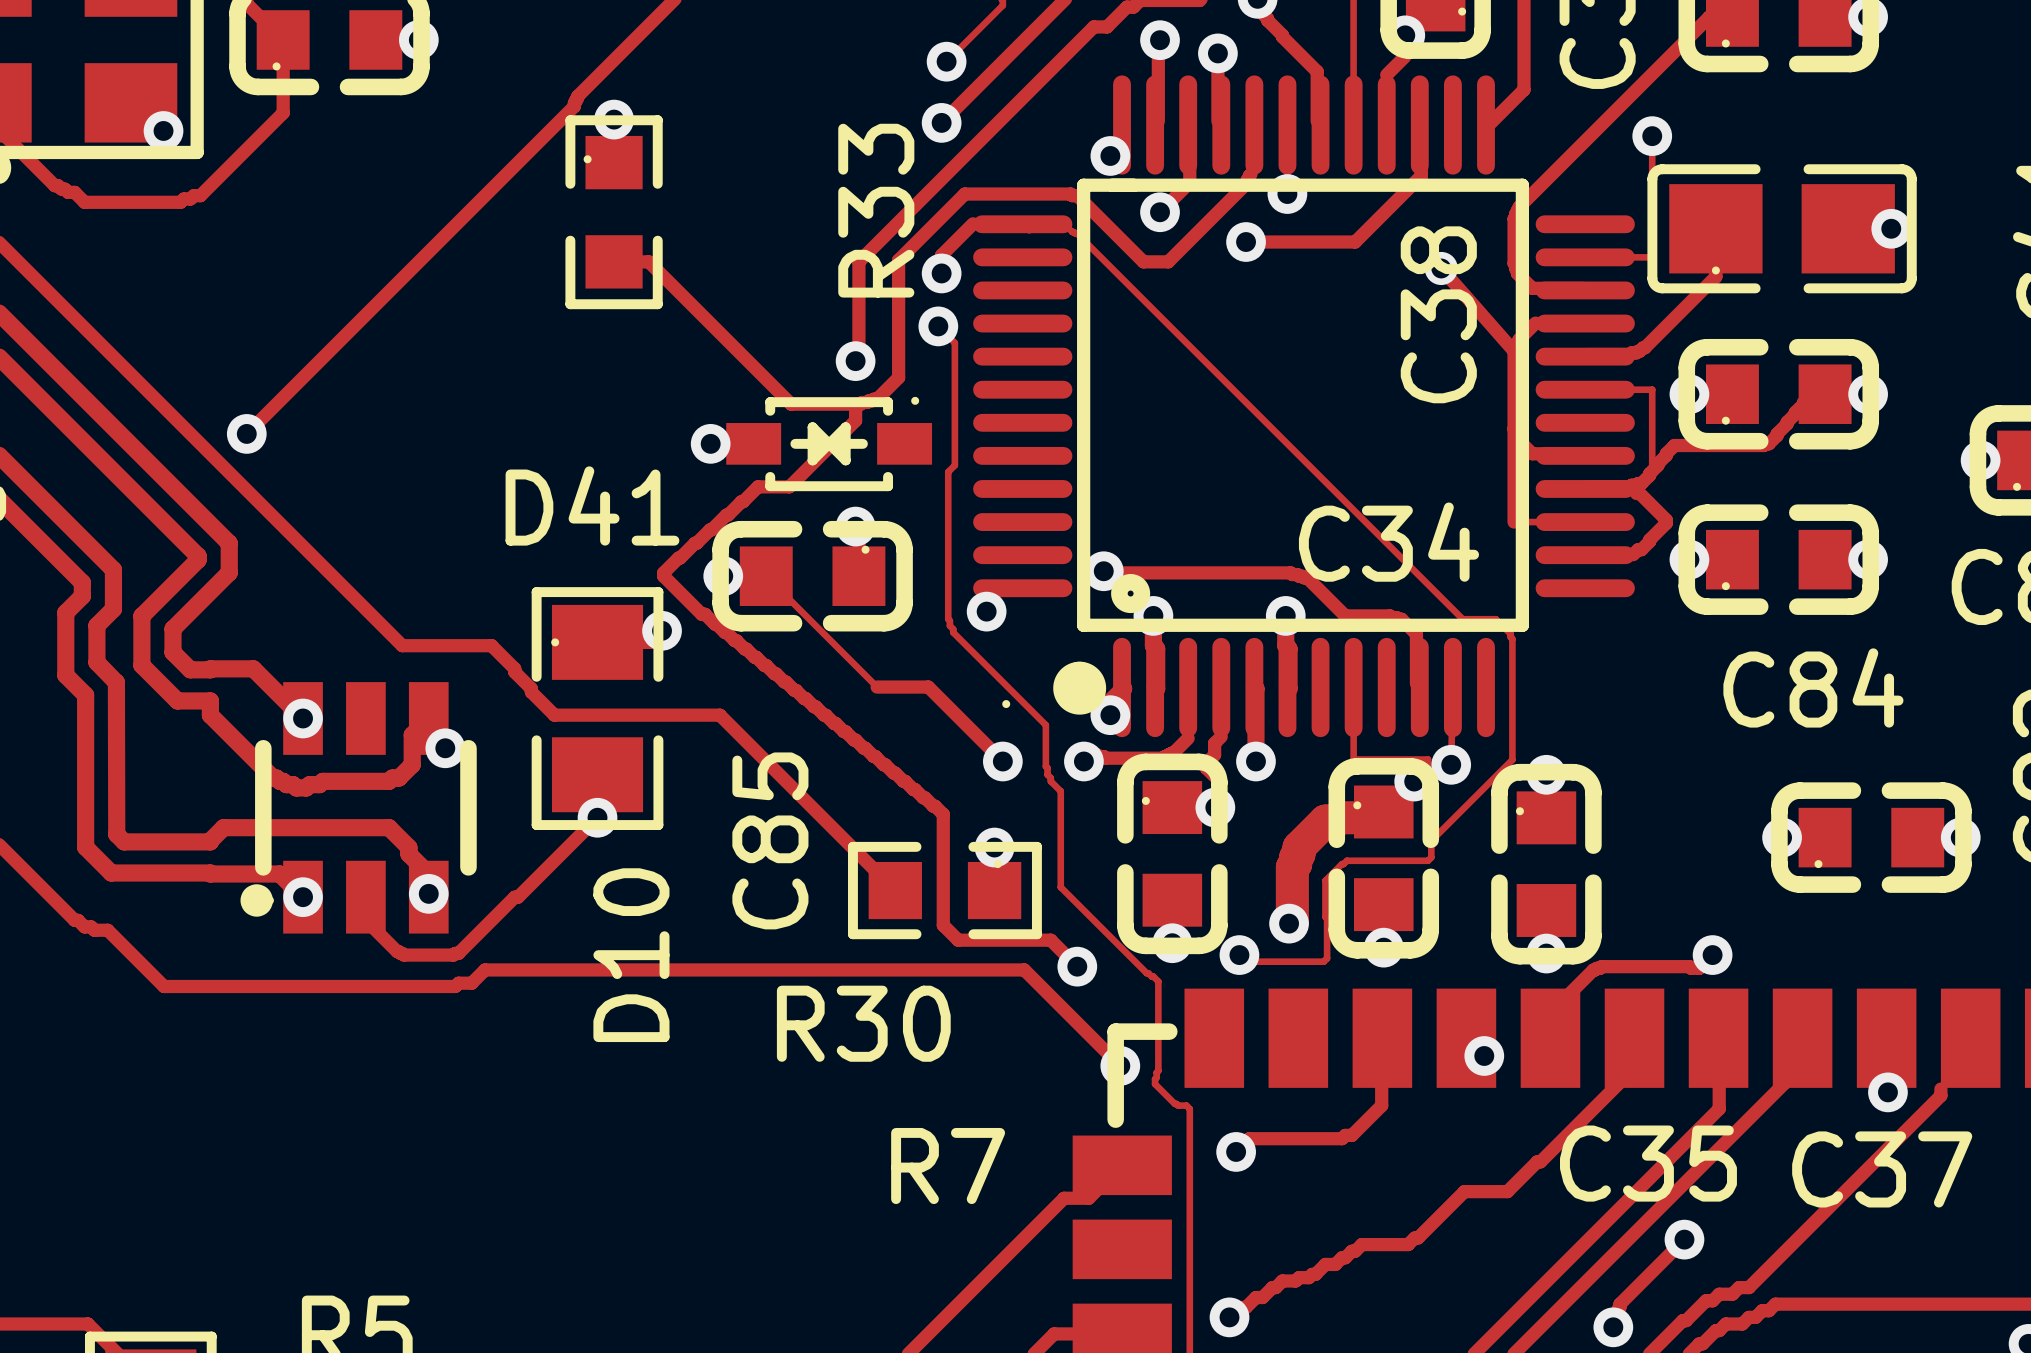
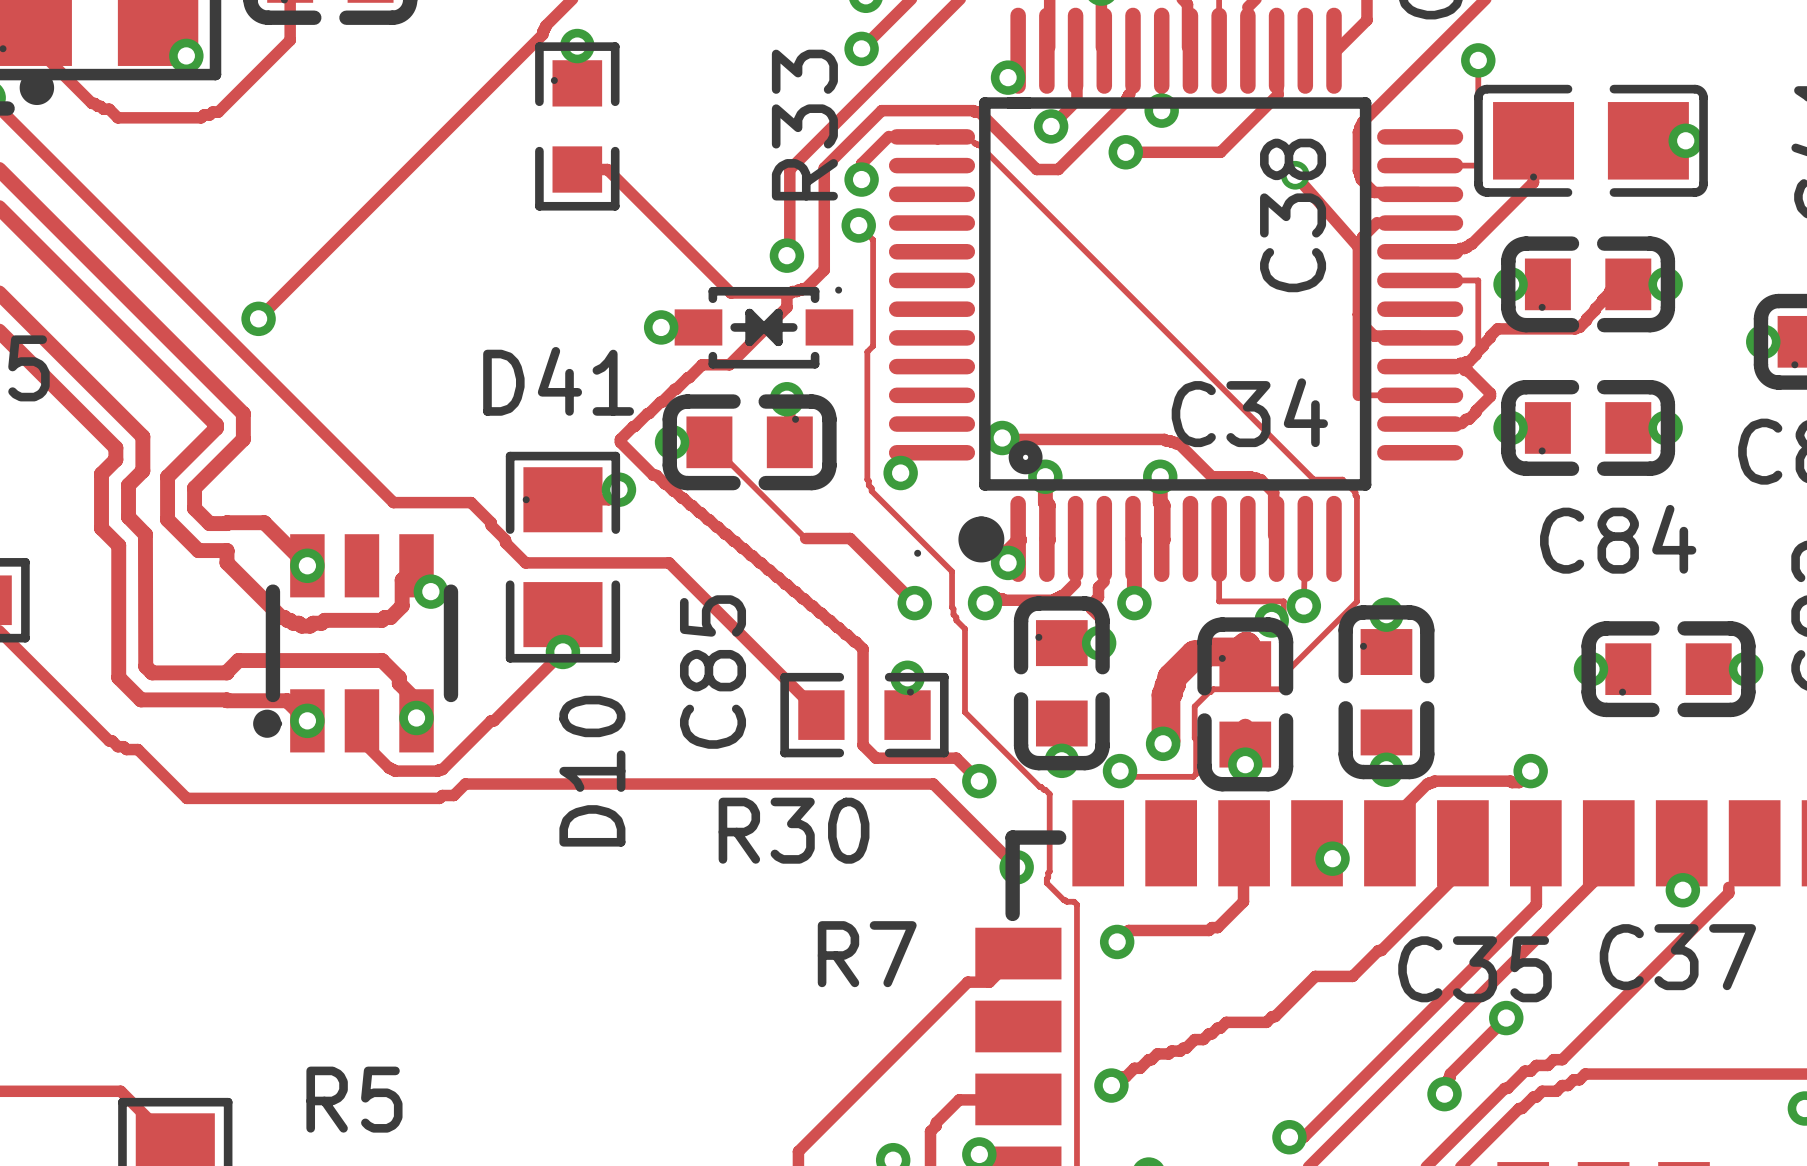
C35 position: (1383, 858) -> (1245, 704)

